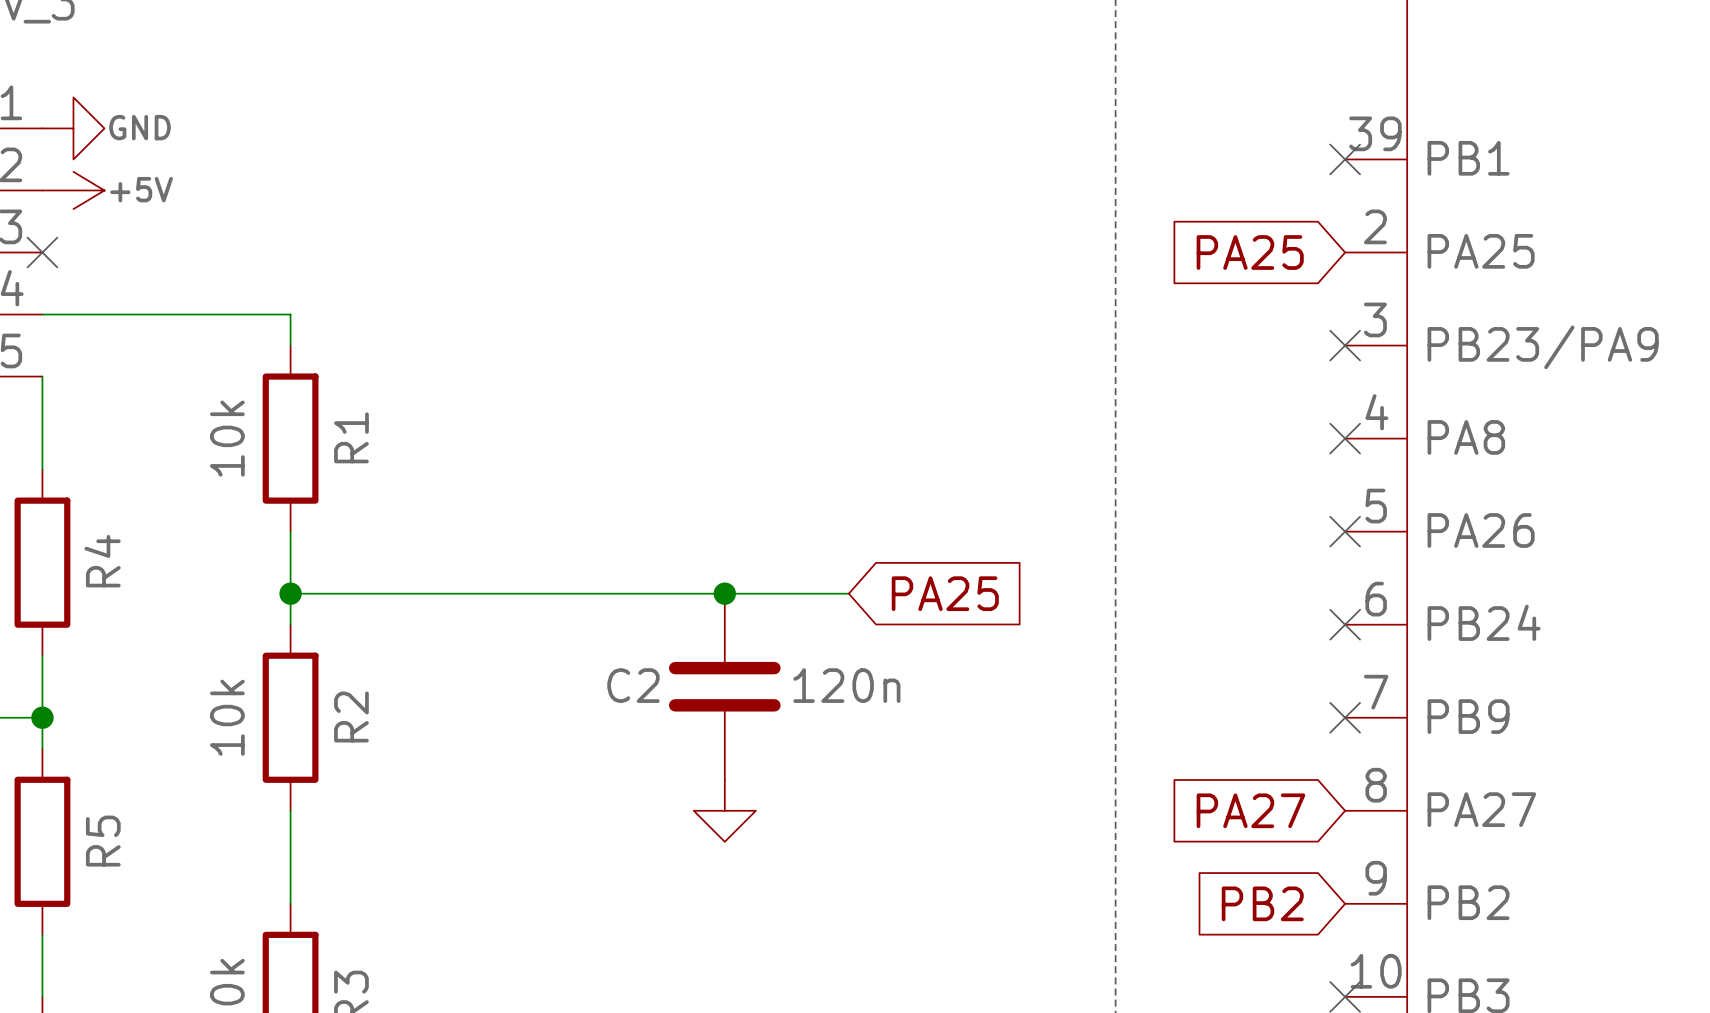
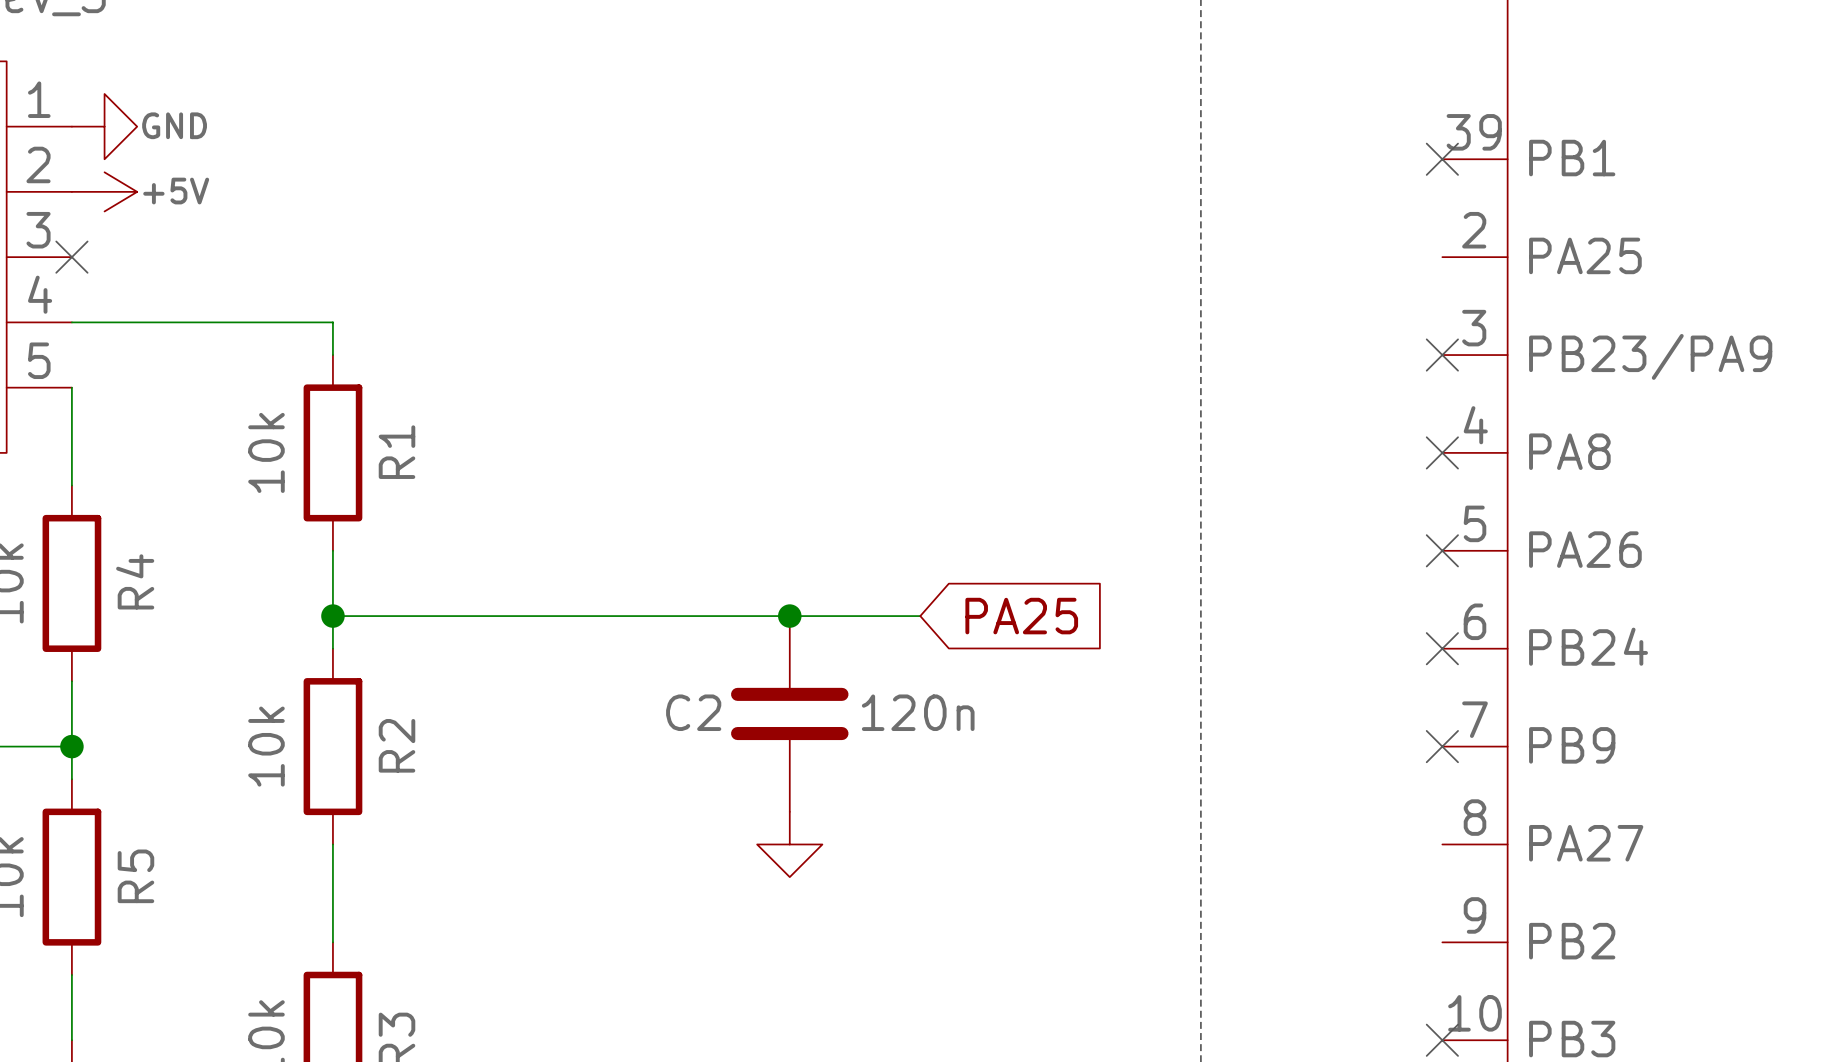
global label: PA25 (1250, 252) -> none
global label: PA27 (1250, 810) -> none
global label: PB2 (1262, 903) -> none

